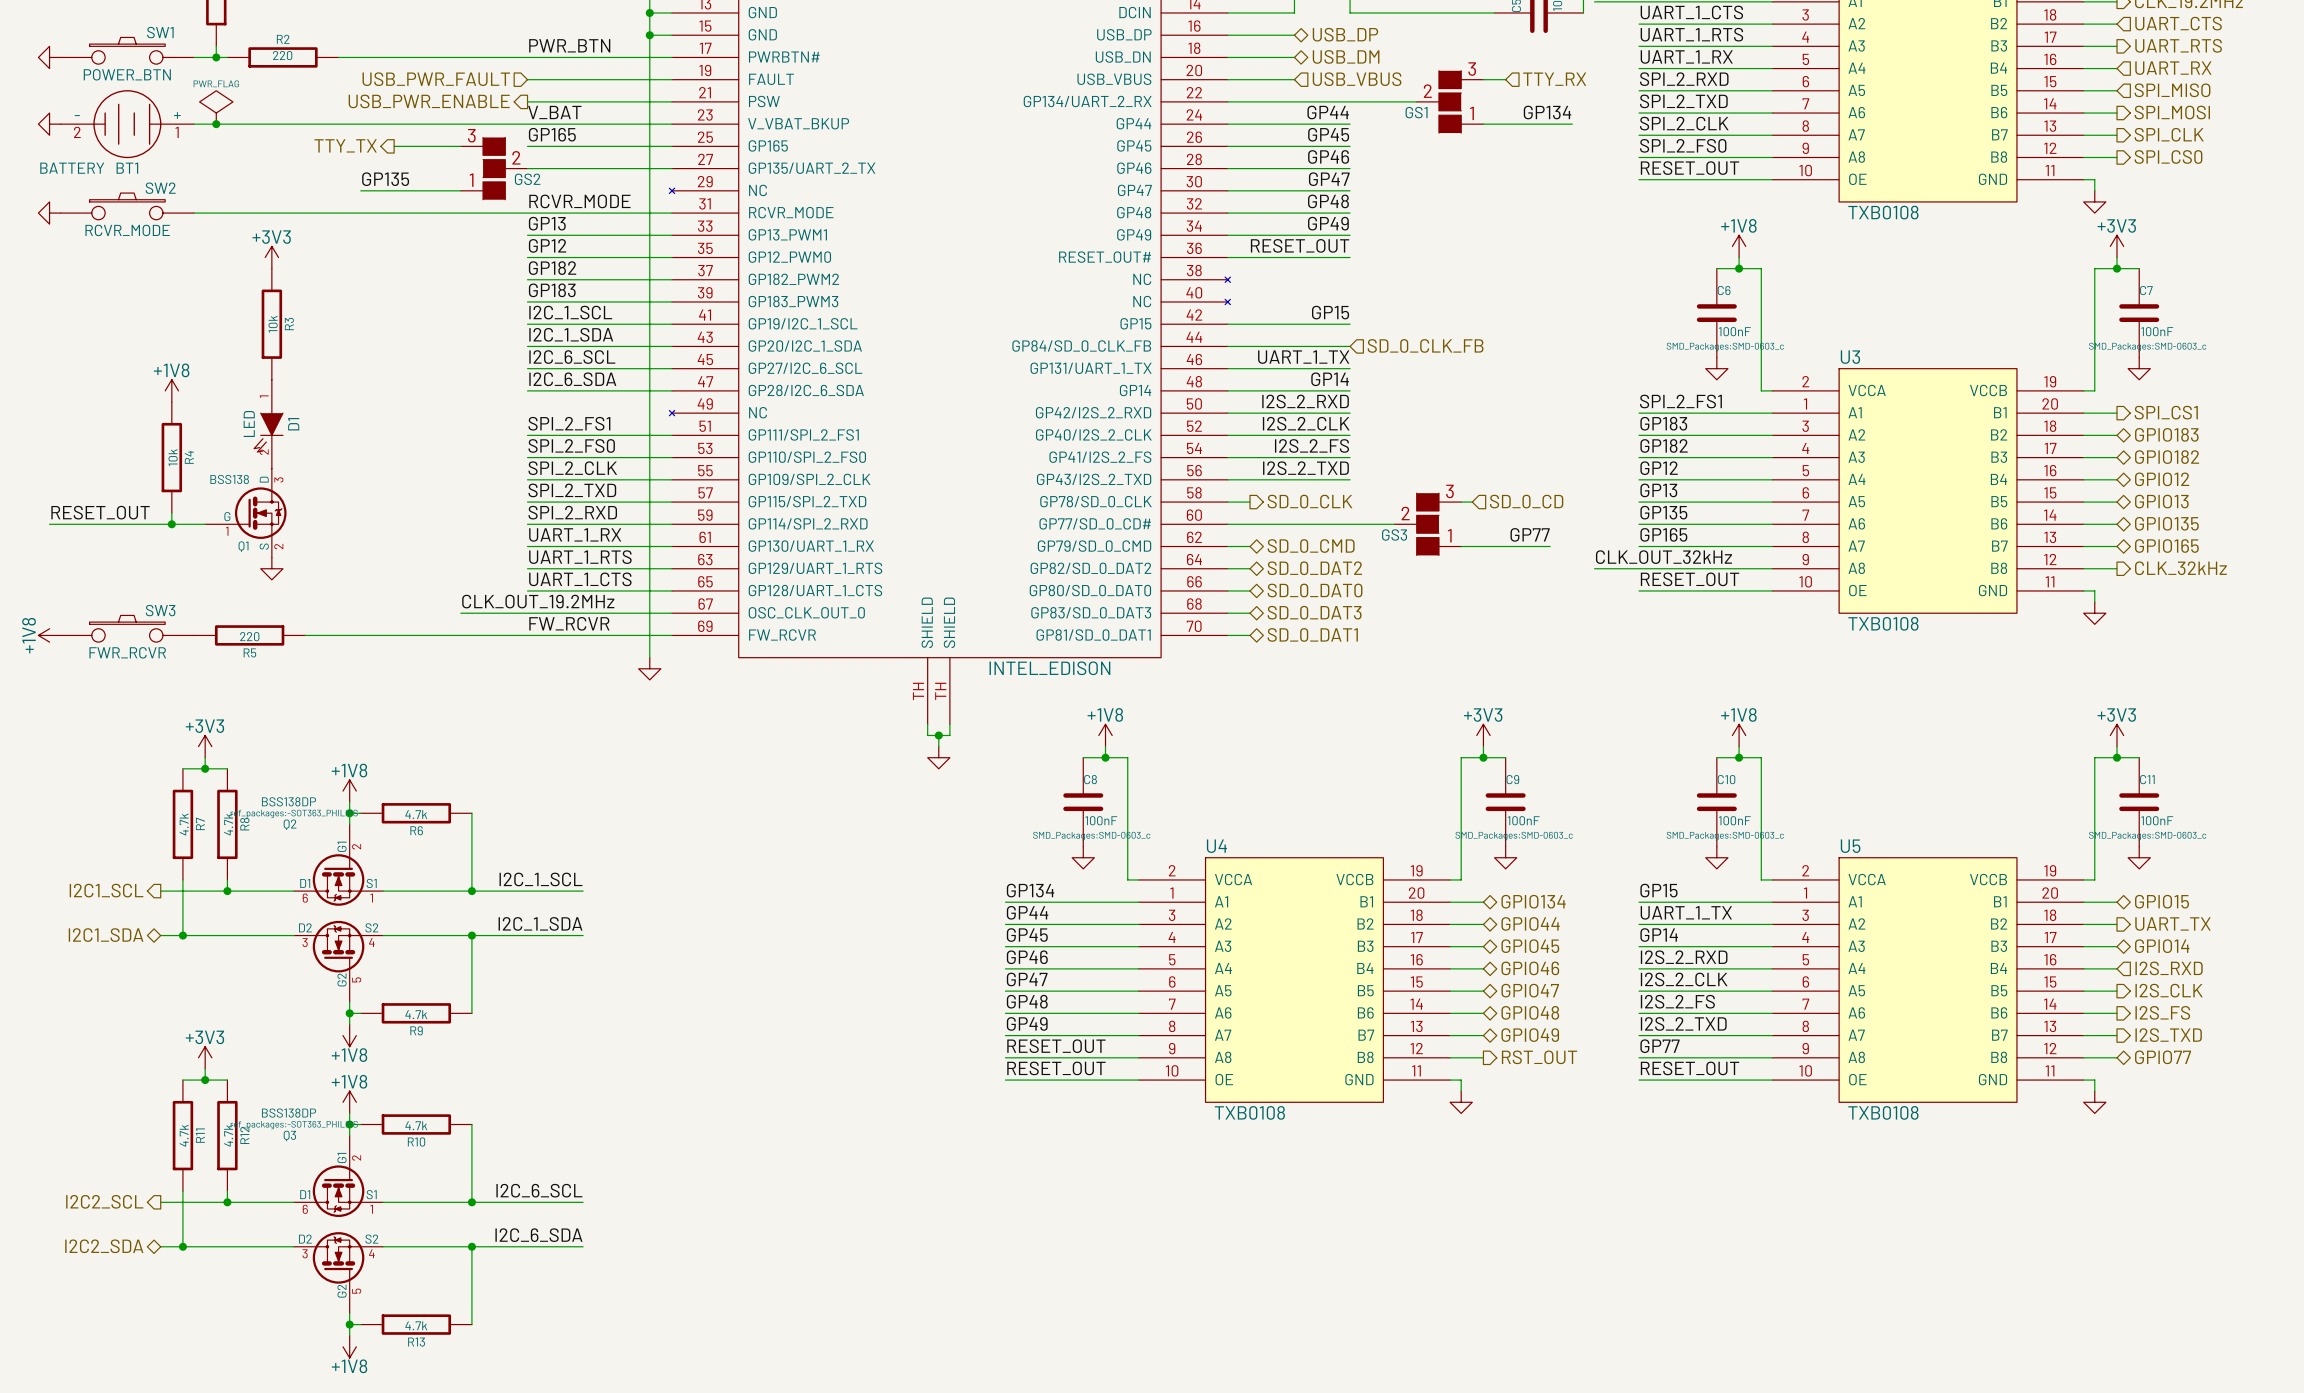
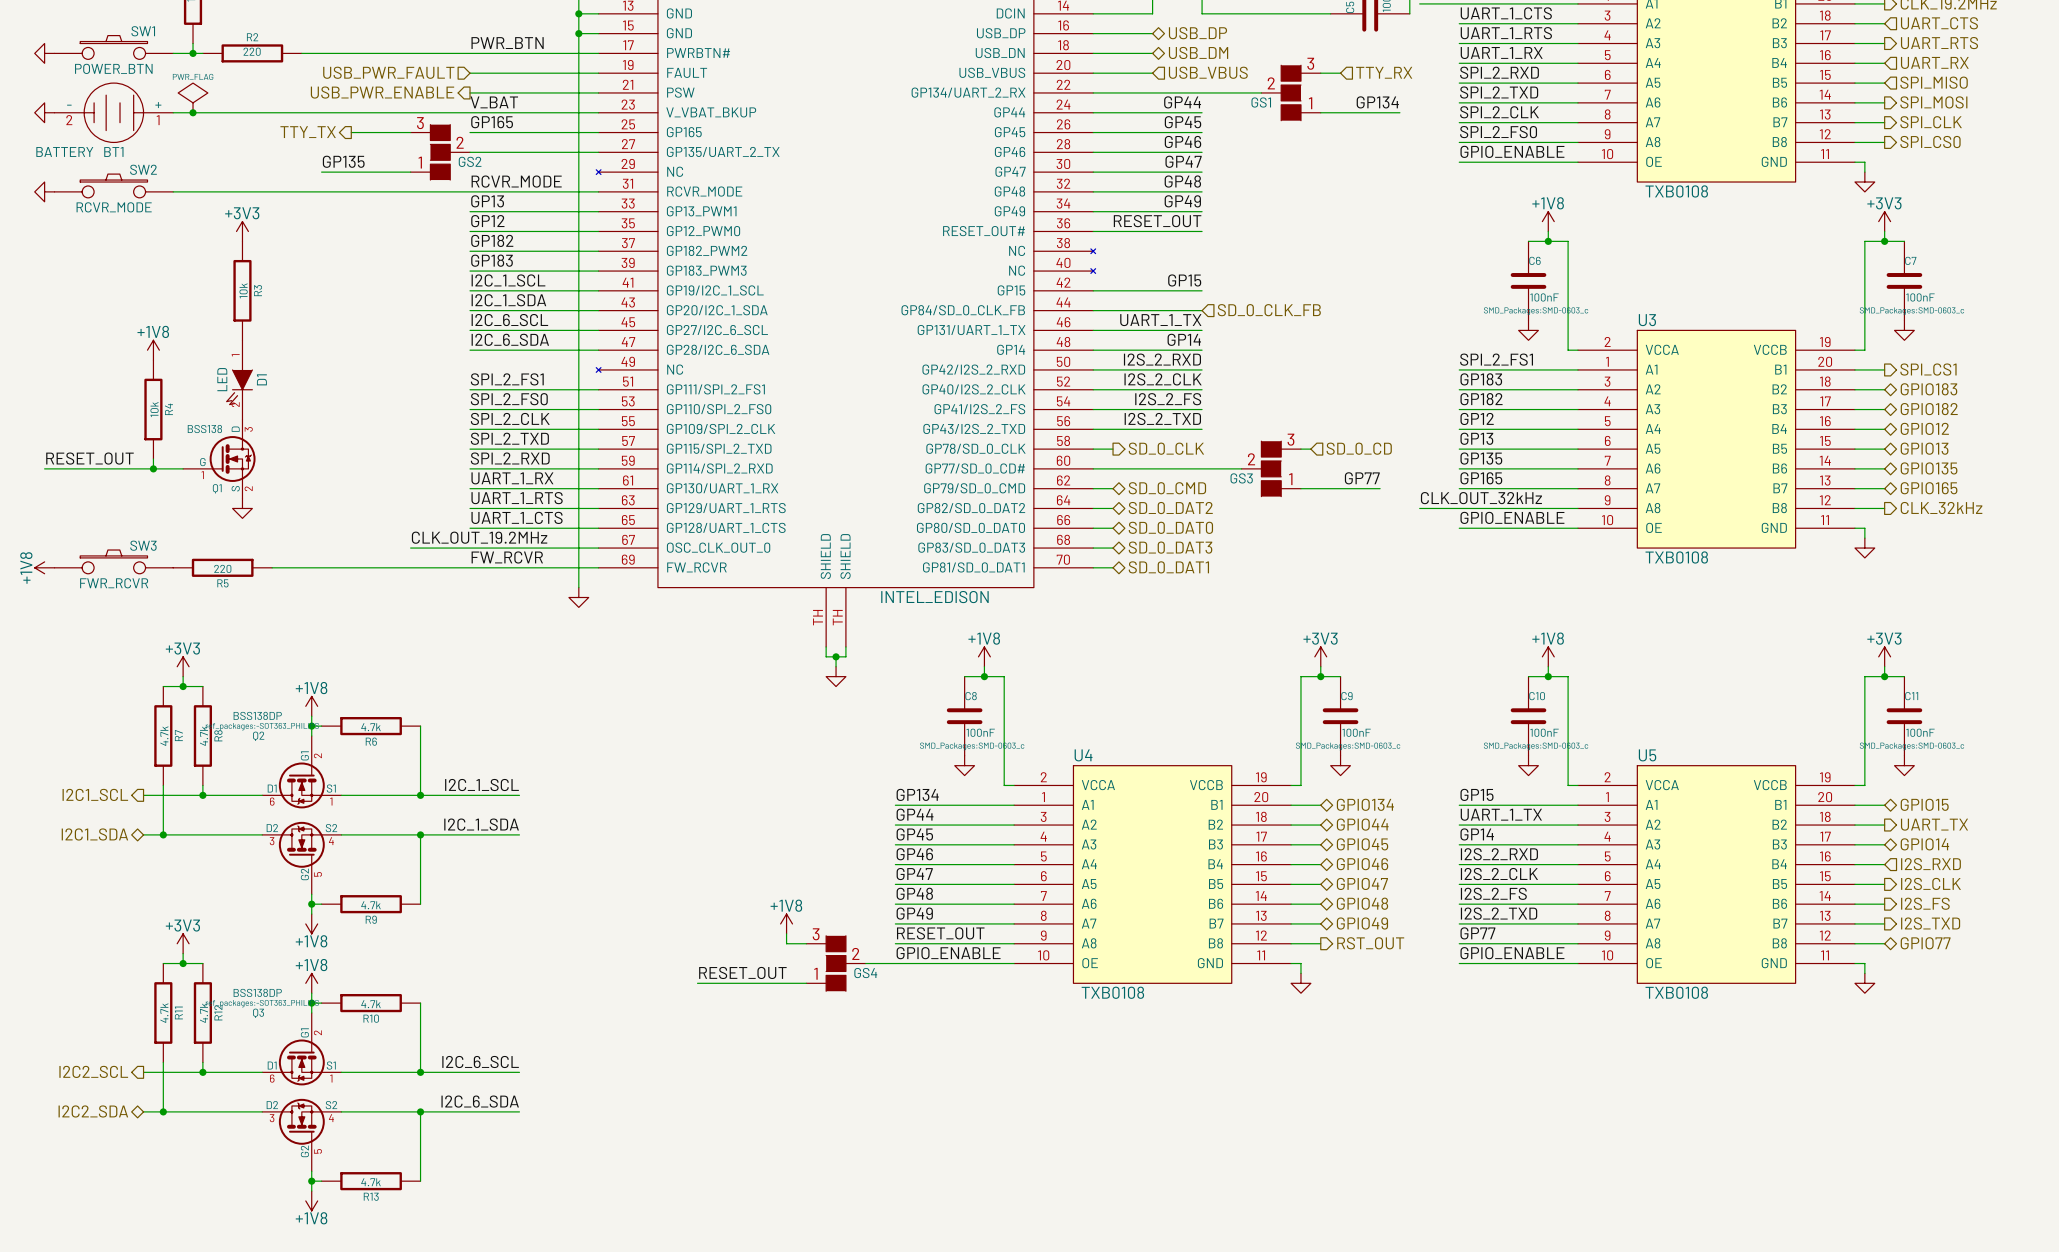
label: RESET_OUT (1690, 168) -> GPIO_ENABLE (1512, 151)
label: RESET_OUT (1690, 579) -> GPIO_ENABLE (1512, 517)
power symbol: none -> +1V8 (786, 923)
wire: none -> (786, 933) (786, 943) (806, 943)
label: RESET_OUT (1056, 1068) -> GPIO_ENABLE (948, 953)
label: RESET_OUT (1690, 1068) -> GPIO_ENABLE (1512, 953)
GS4: none -> (836, 963)
wire: none -> (865, 963) (895, 963)
label: none -> RESET_OUT (742, 972)
wire: none -> (697, 983) (806, 983)

